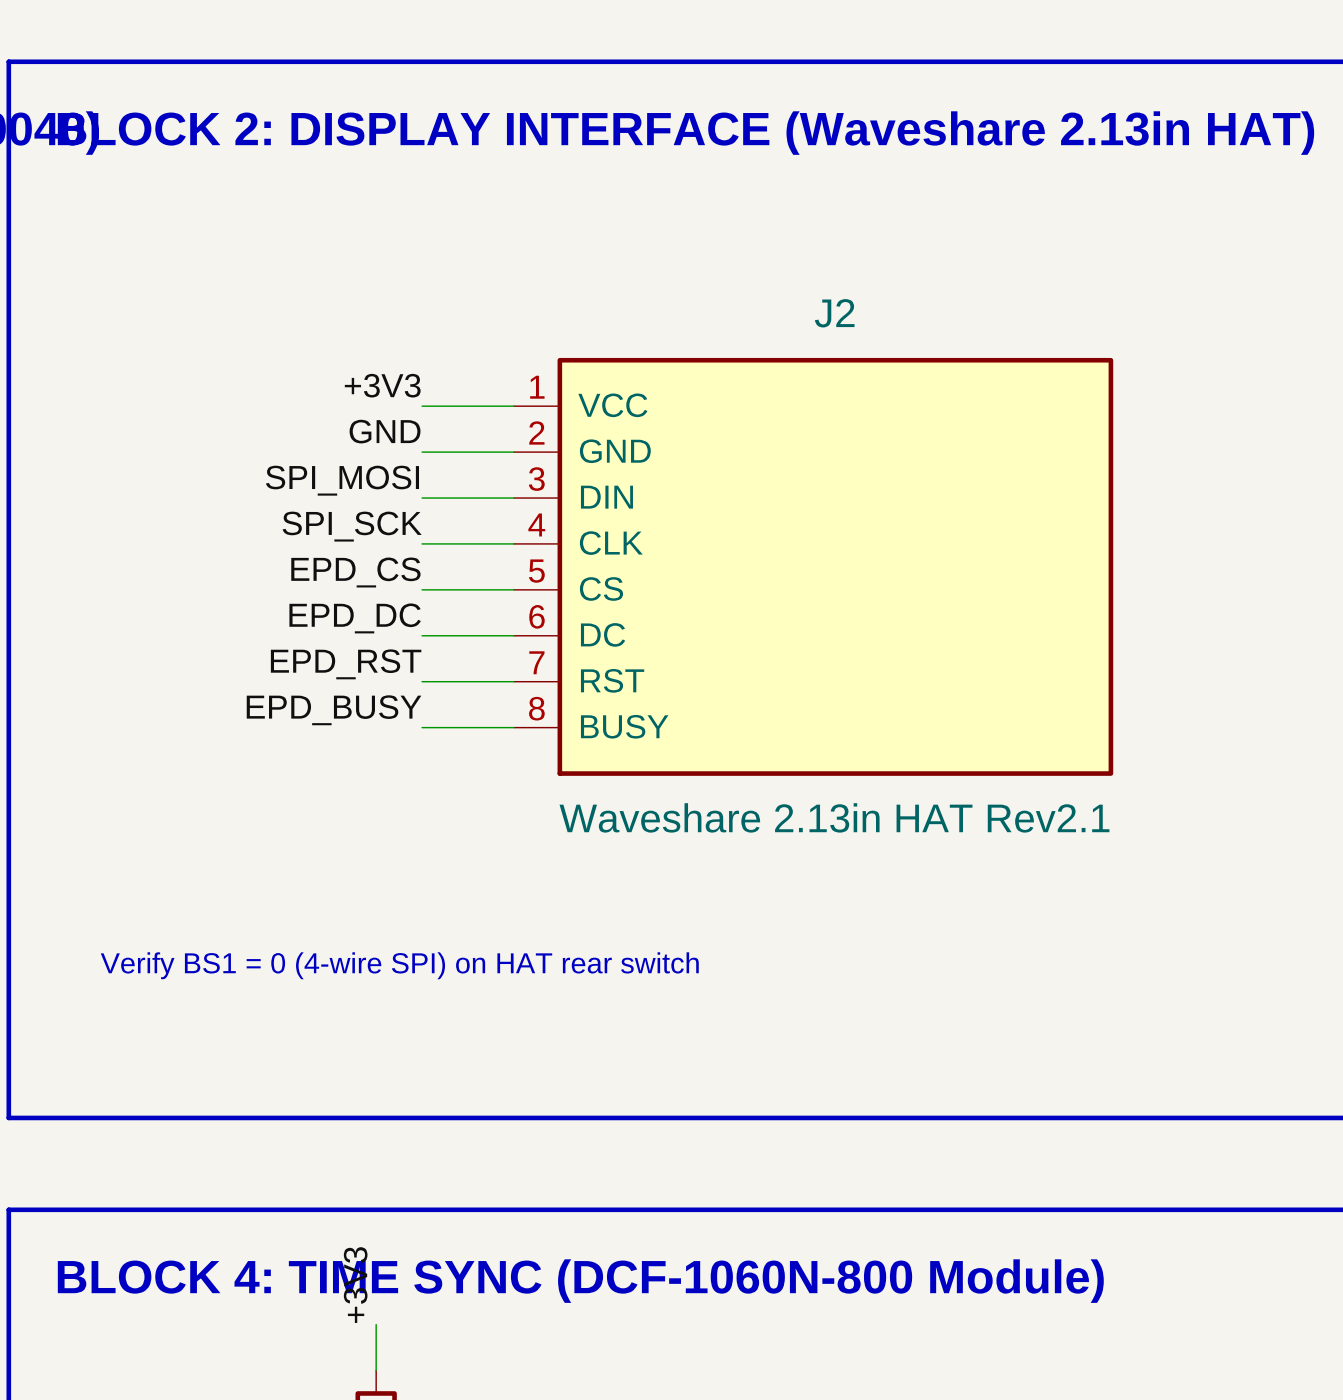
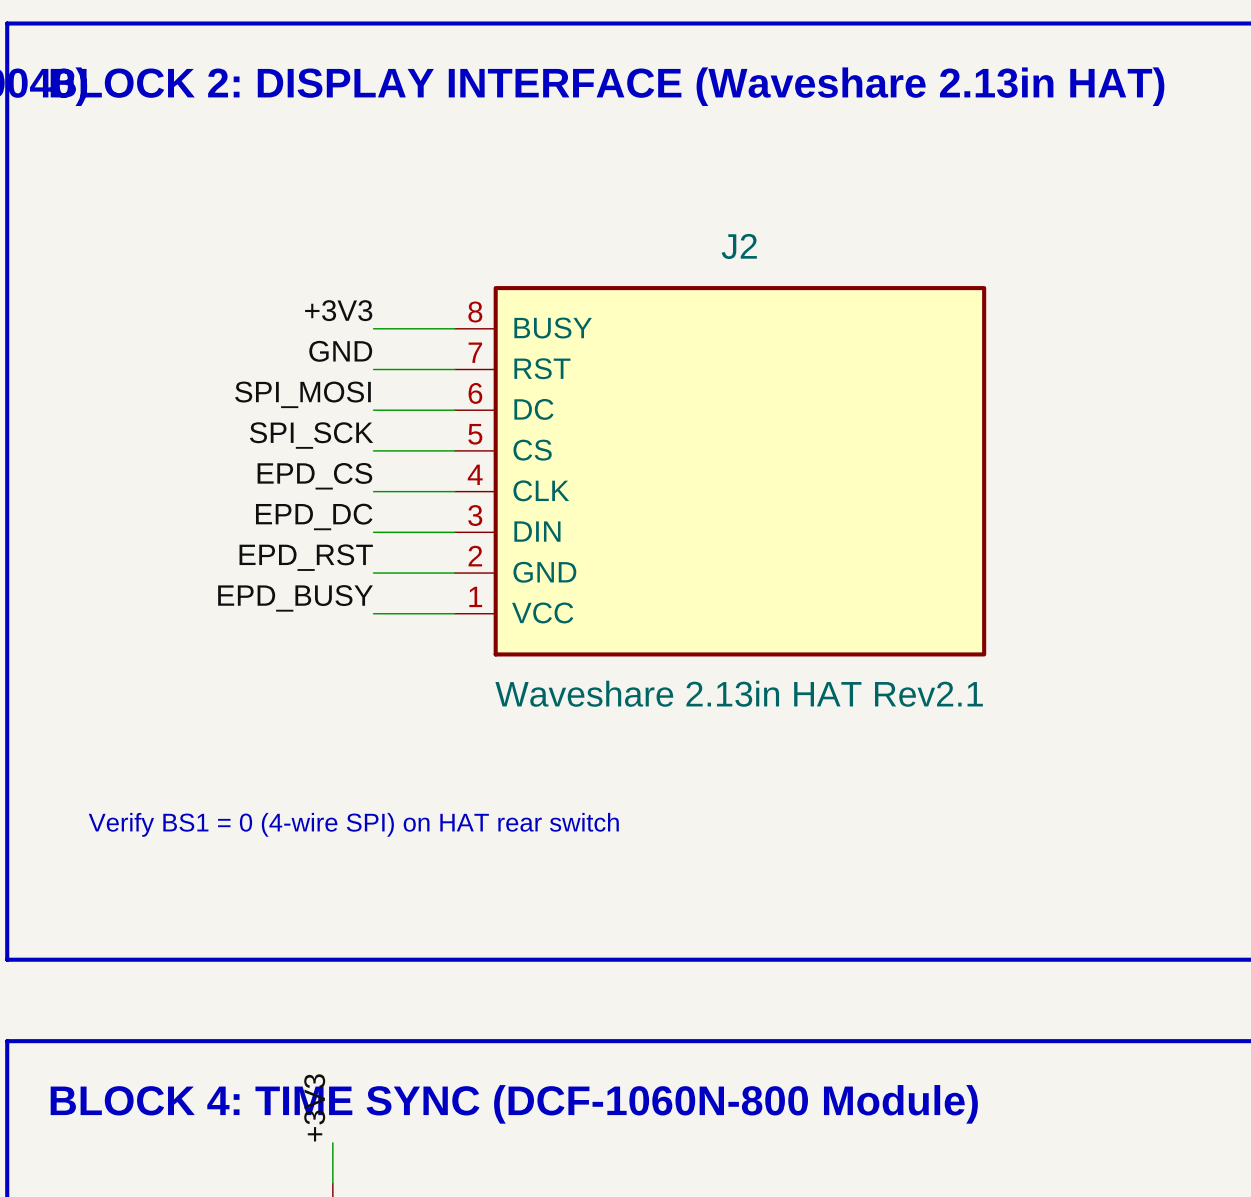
J2 flip: as is (835, 566) -> up-down (739, 471)

